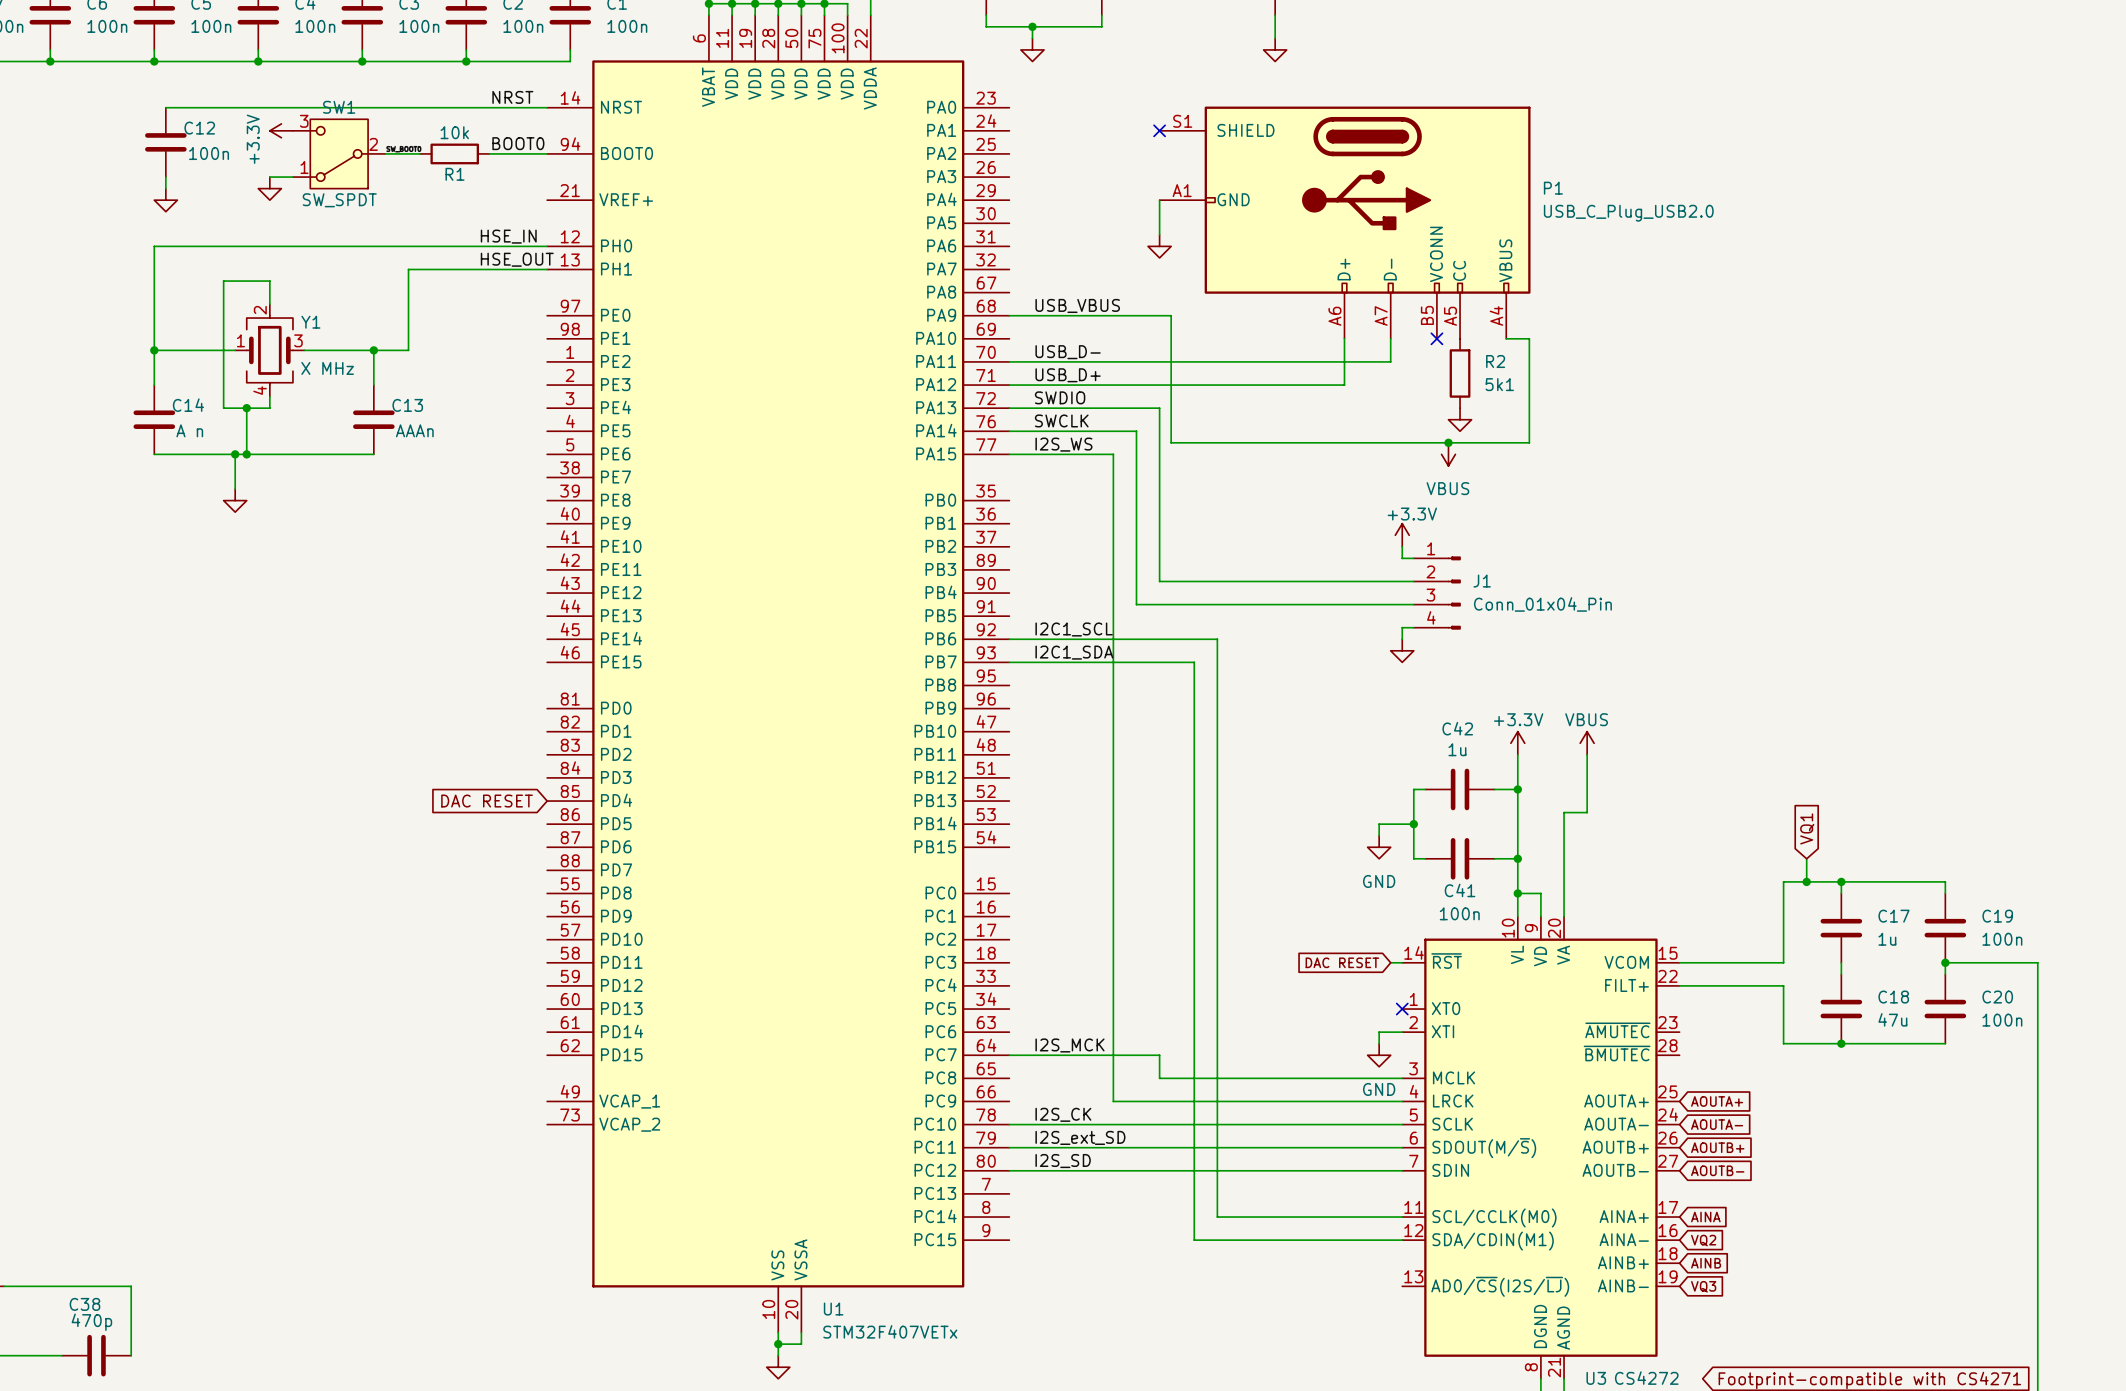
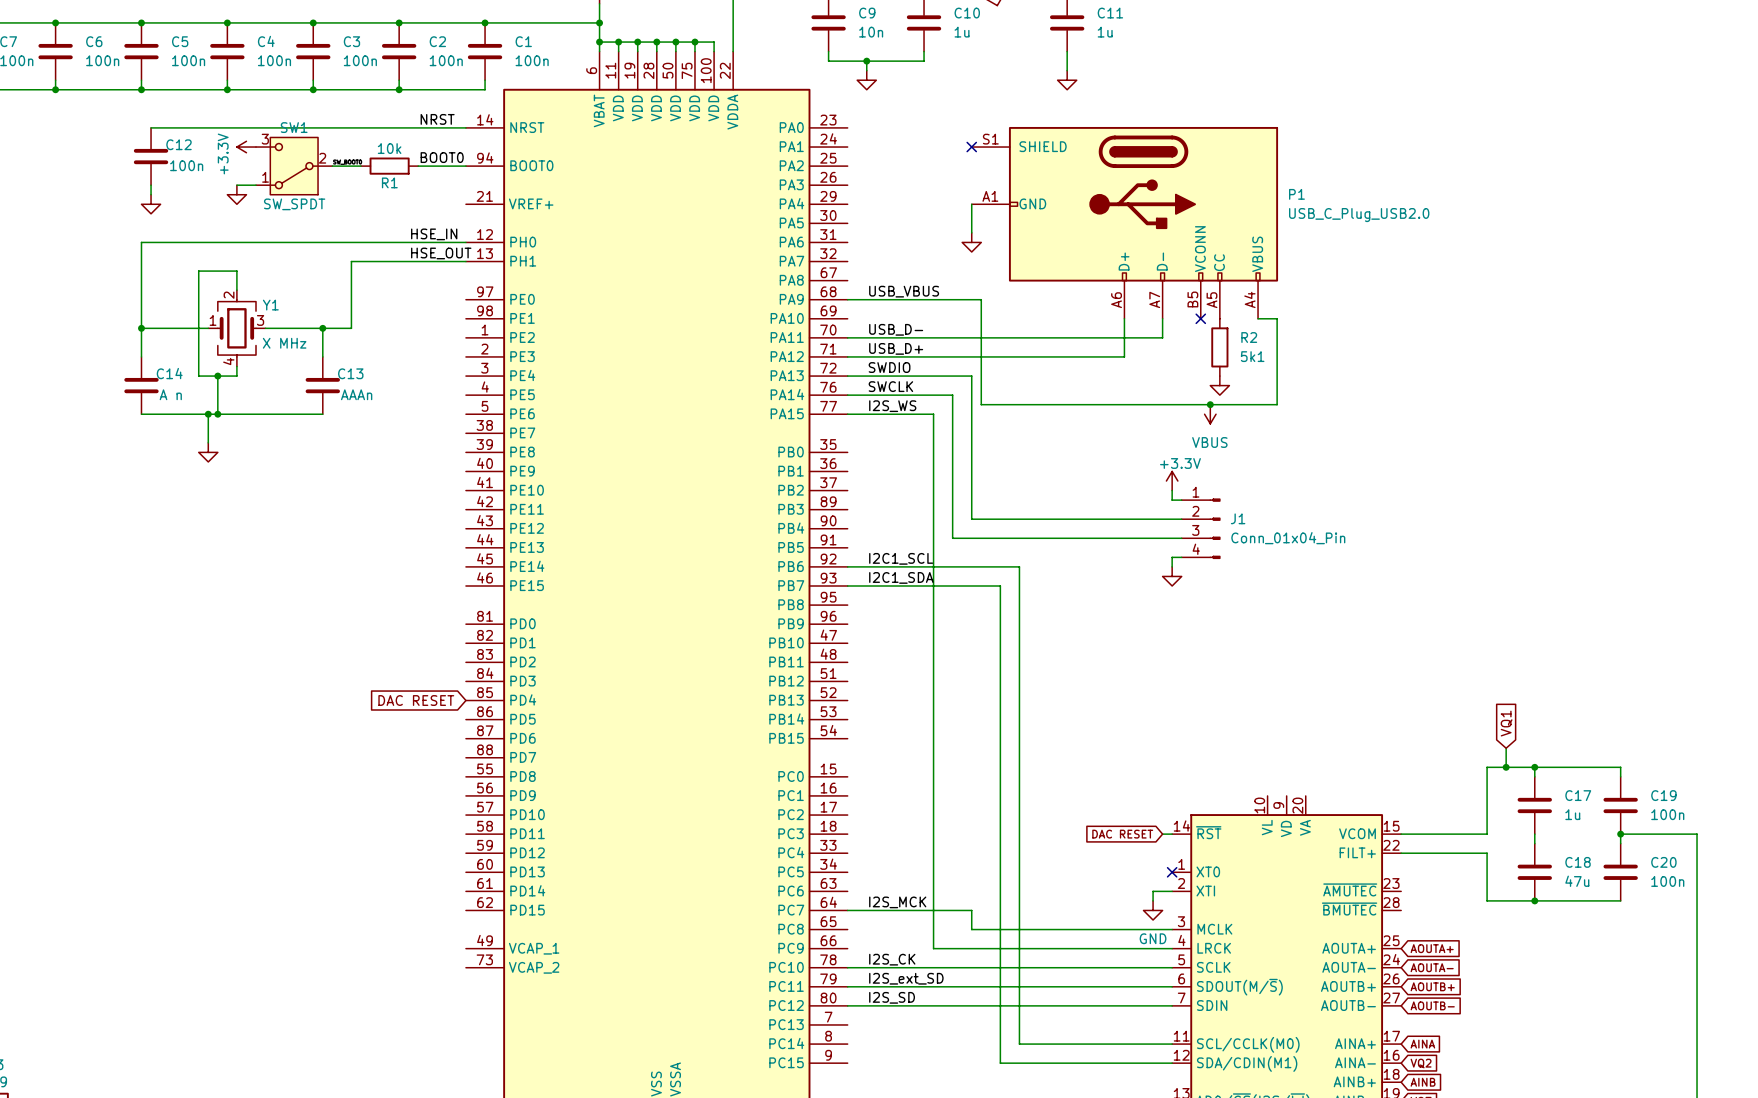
power symbol: +3.3V (1517, 743) -> none
power symbol: VBUS (1587, 743) -> none
wire: (1517, 754) (1517, 916) -> none
wire: (1587, 754) (1587, 812) (1564, 812) (1564, 916) -> none
wire: (1425, 789) (1413, 789) (1413, 858) (1425, 858) -> none
C42: 1u (1460, 789) -> none
wire: (1494, 789) (1517, 789) -> none
junction: (1517, 789) -> none
wire: (1413, 824) (1379, 824) (1379, 835) -> none
junction: (1413, 824) -> none
power symbol: GND (1379, 847) -> none
C41: 100n (1460, 858) -> none
wire: (1494, 858) (1517, 858) -> none
junction: (1517, 858) -> none
wire: (1517, 893) (1540, 893) (1540, 916) -> none
junction: (1517, 893) -> none

